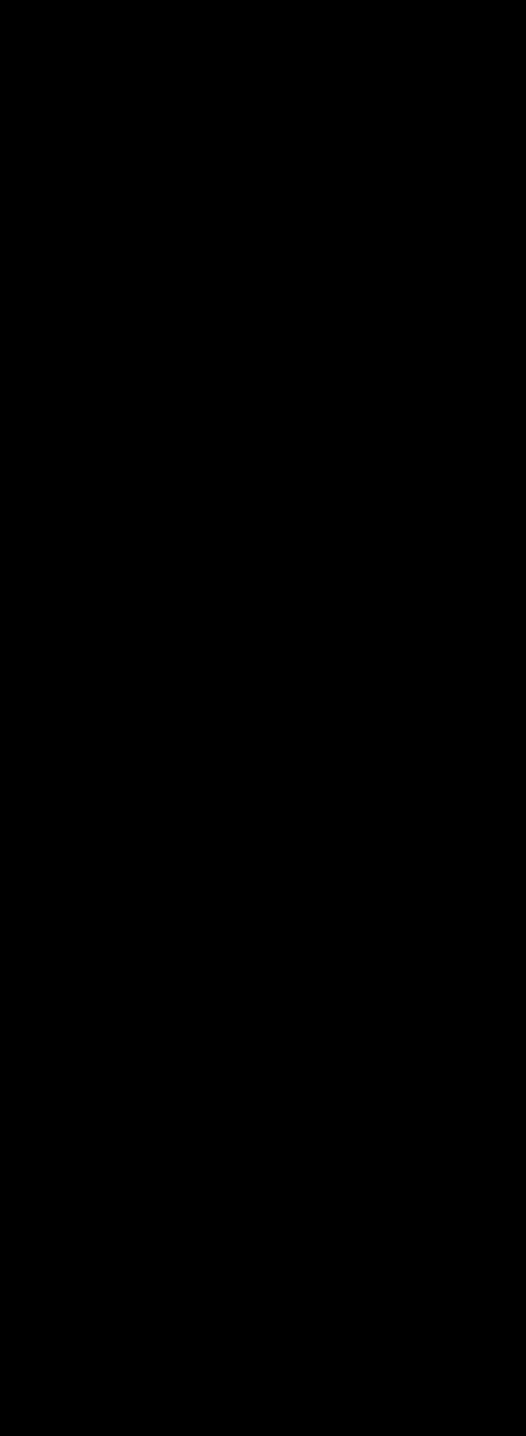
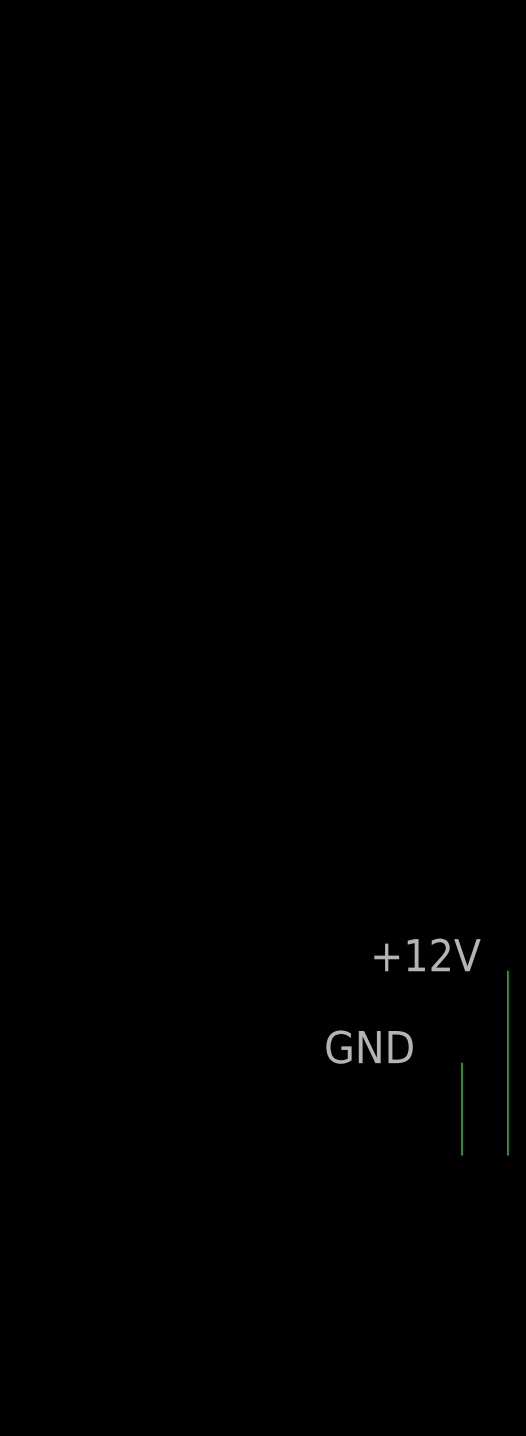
label: none -> +12V (427, 954)
wire: none -> (507, 971) (507, 1155)
label: none -> GND (369, 1047)
wire: none -> (461, 1063) (461, 1155)

